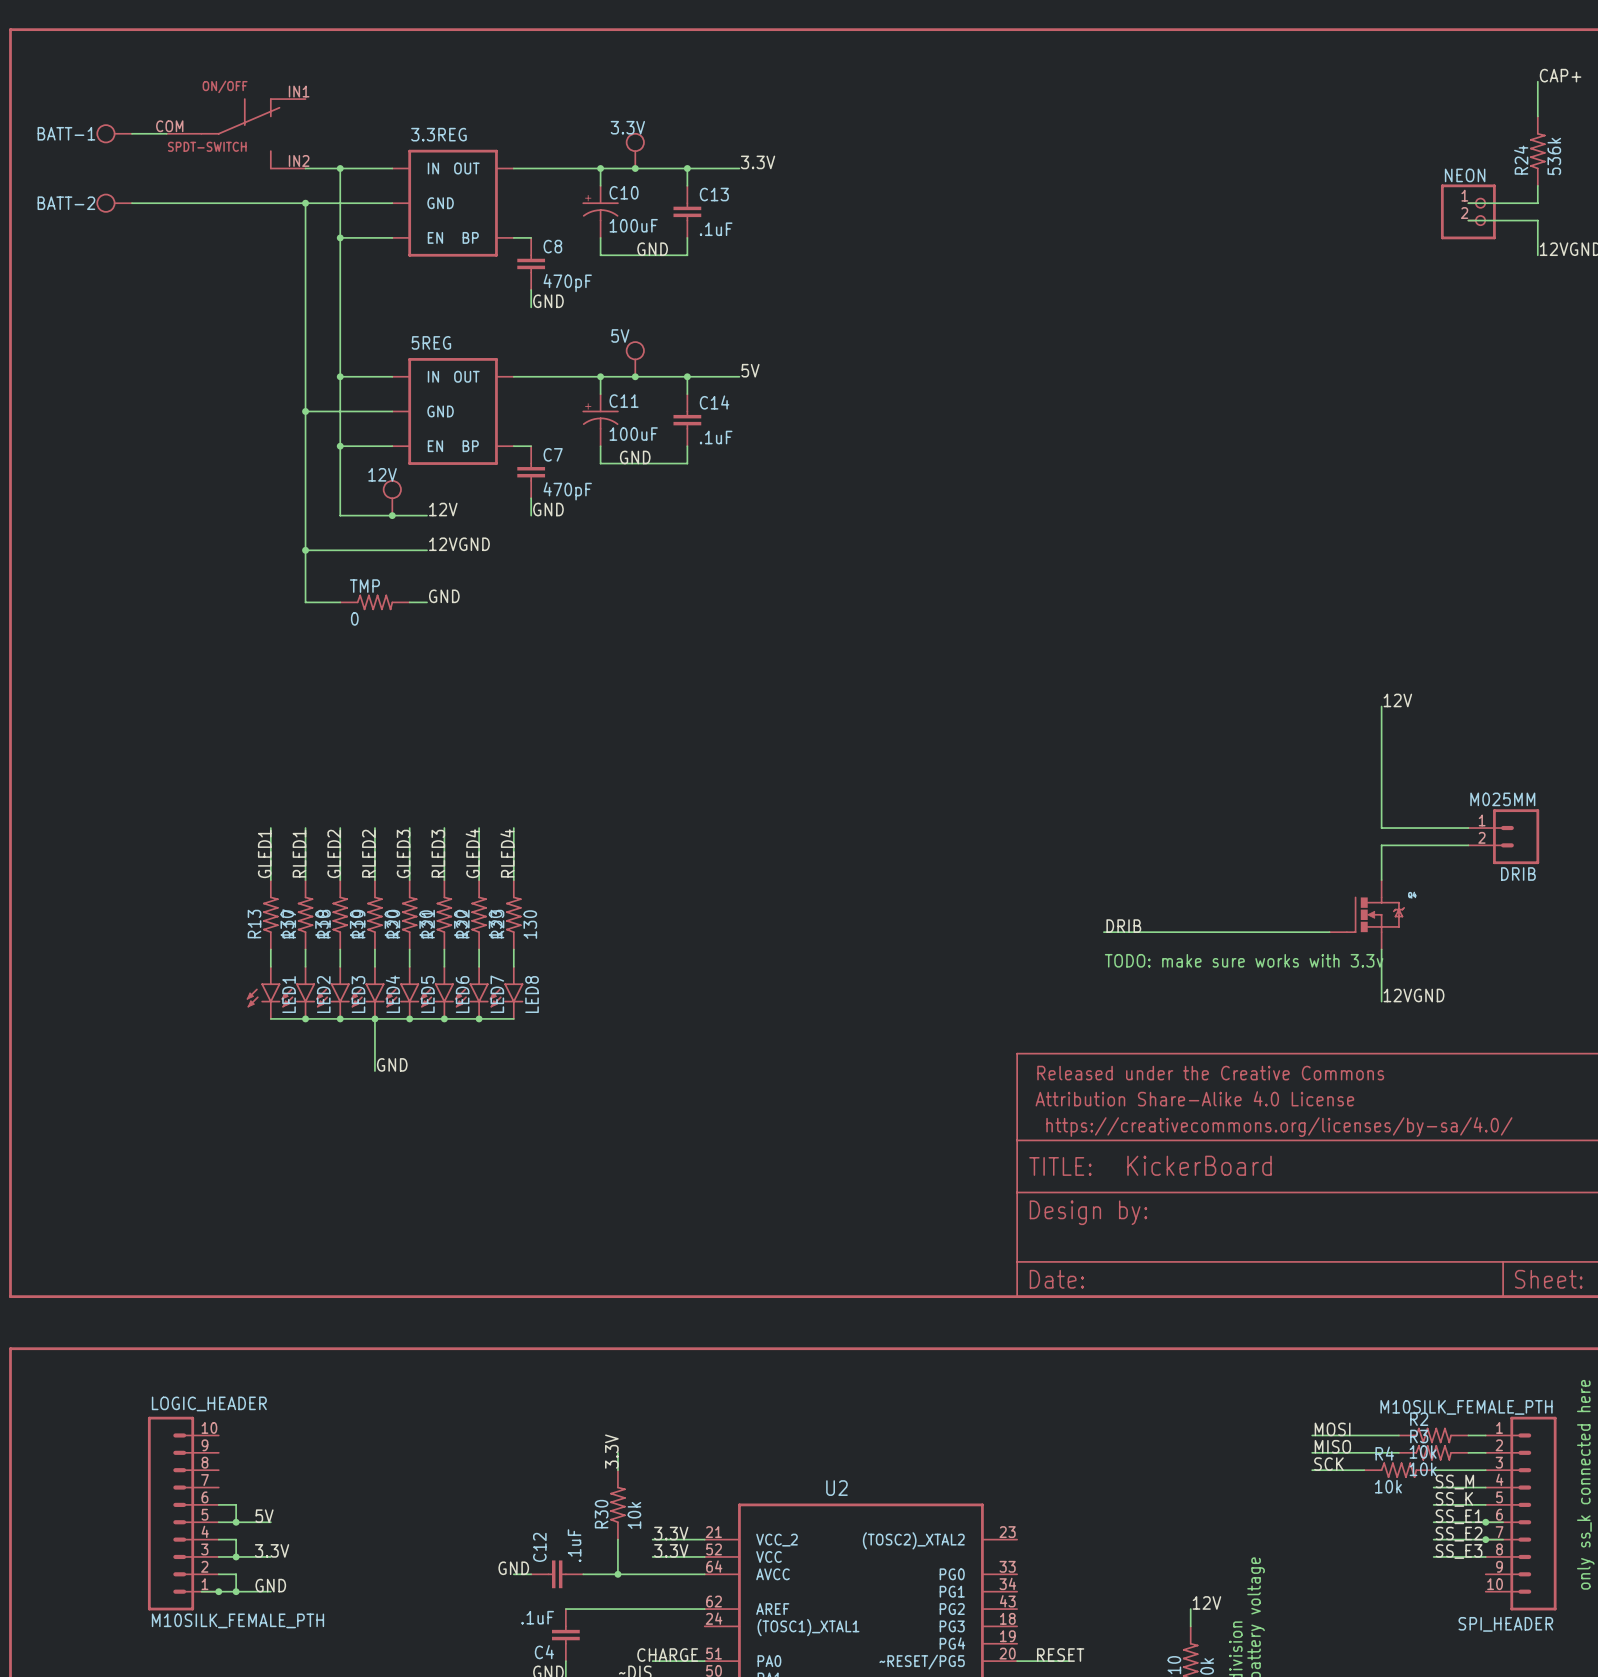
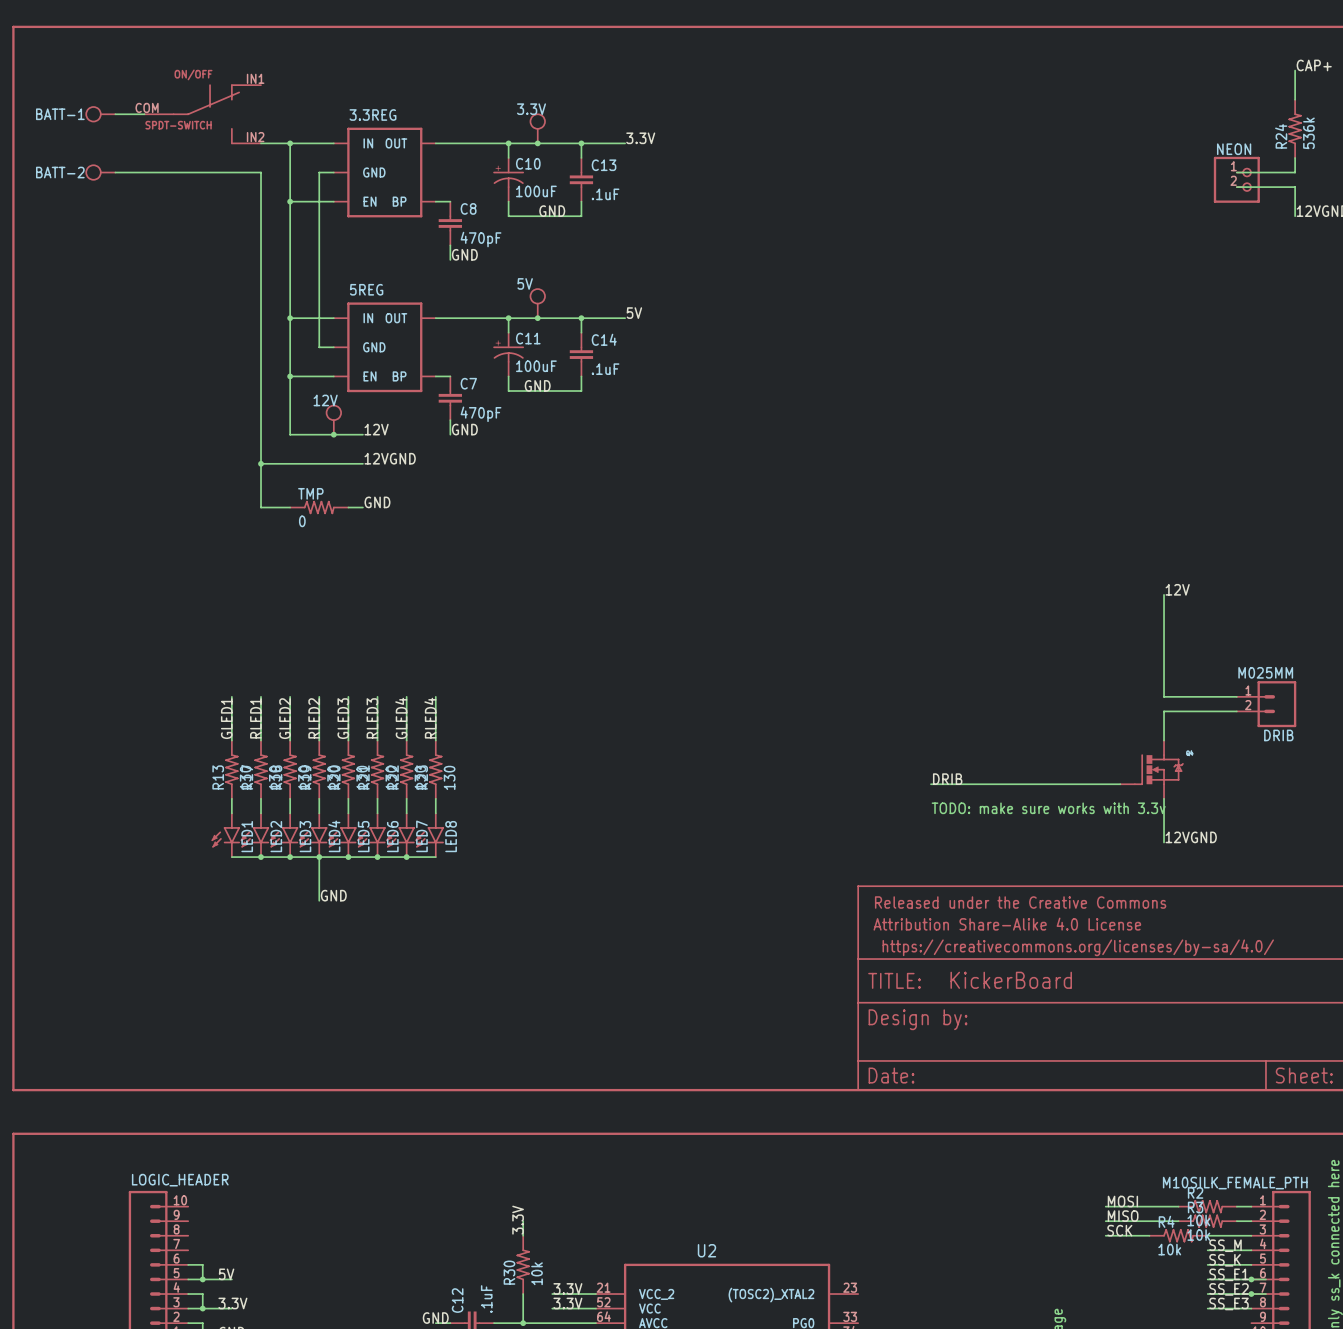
wire: (305, 203) (374, 203) -> (319, 347) (319, 172)
junction: (305, 203) -> none
wire: (305, 411) (374, 411) -> none
junction: (305, 411) -> none

